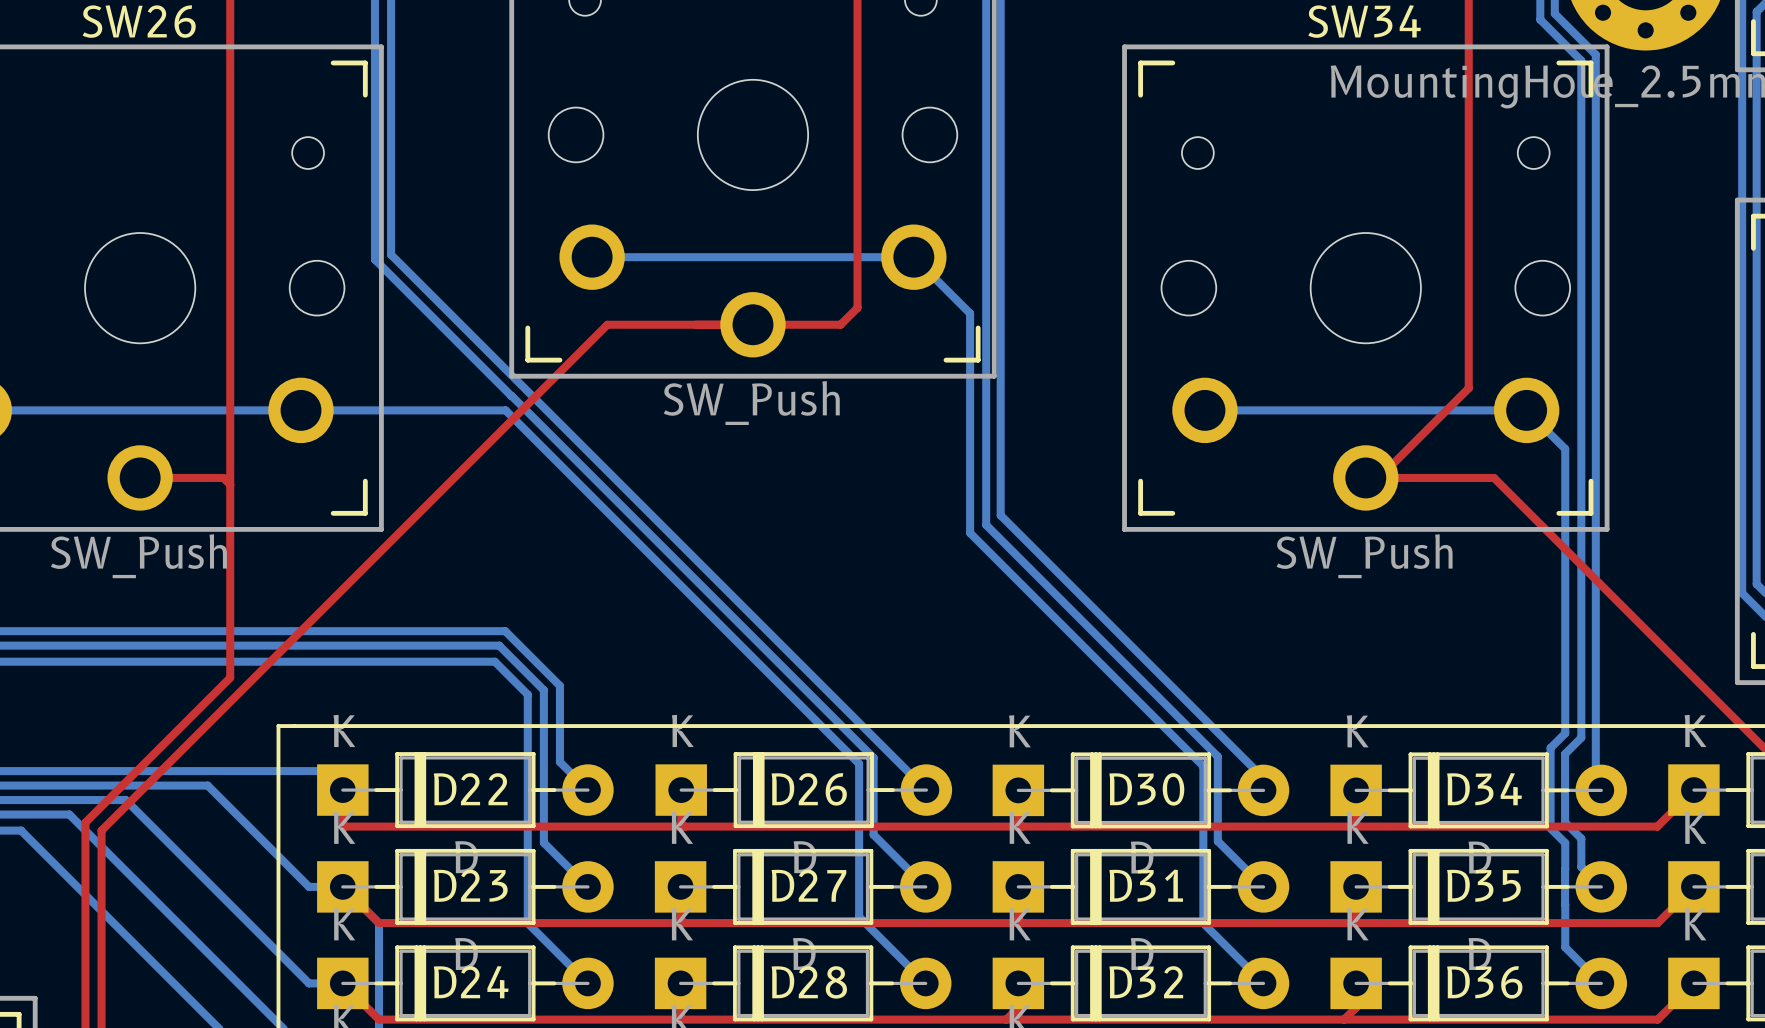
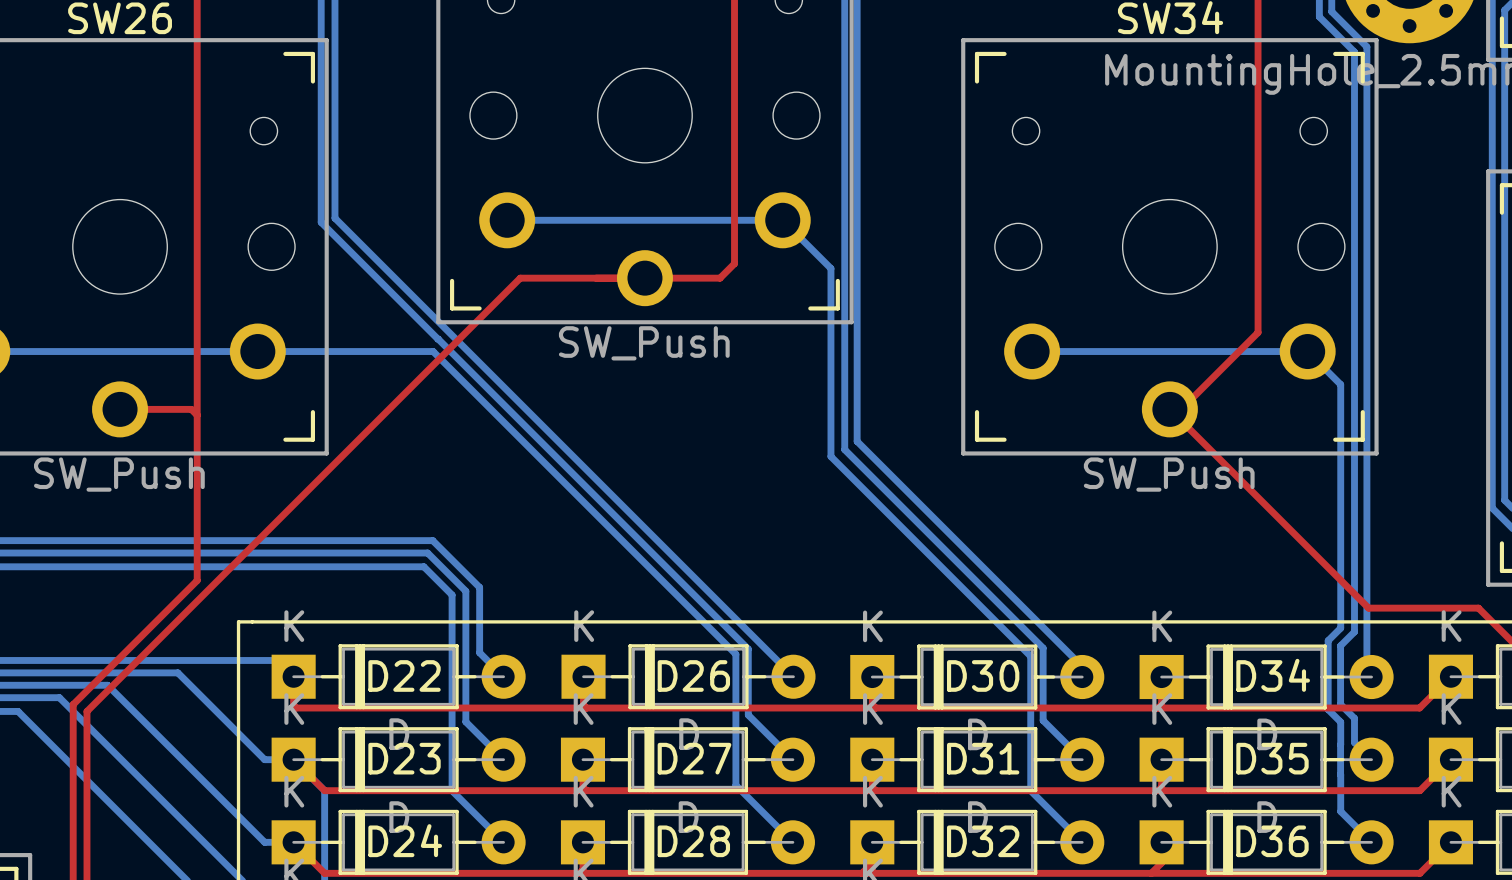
top track: (1379, 477) (1494, 477) (1726, 709) -> (1169, 409) (1368, 608) (1478, 608)

